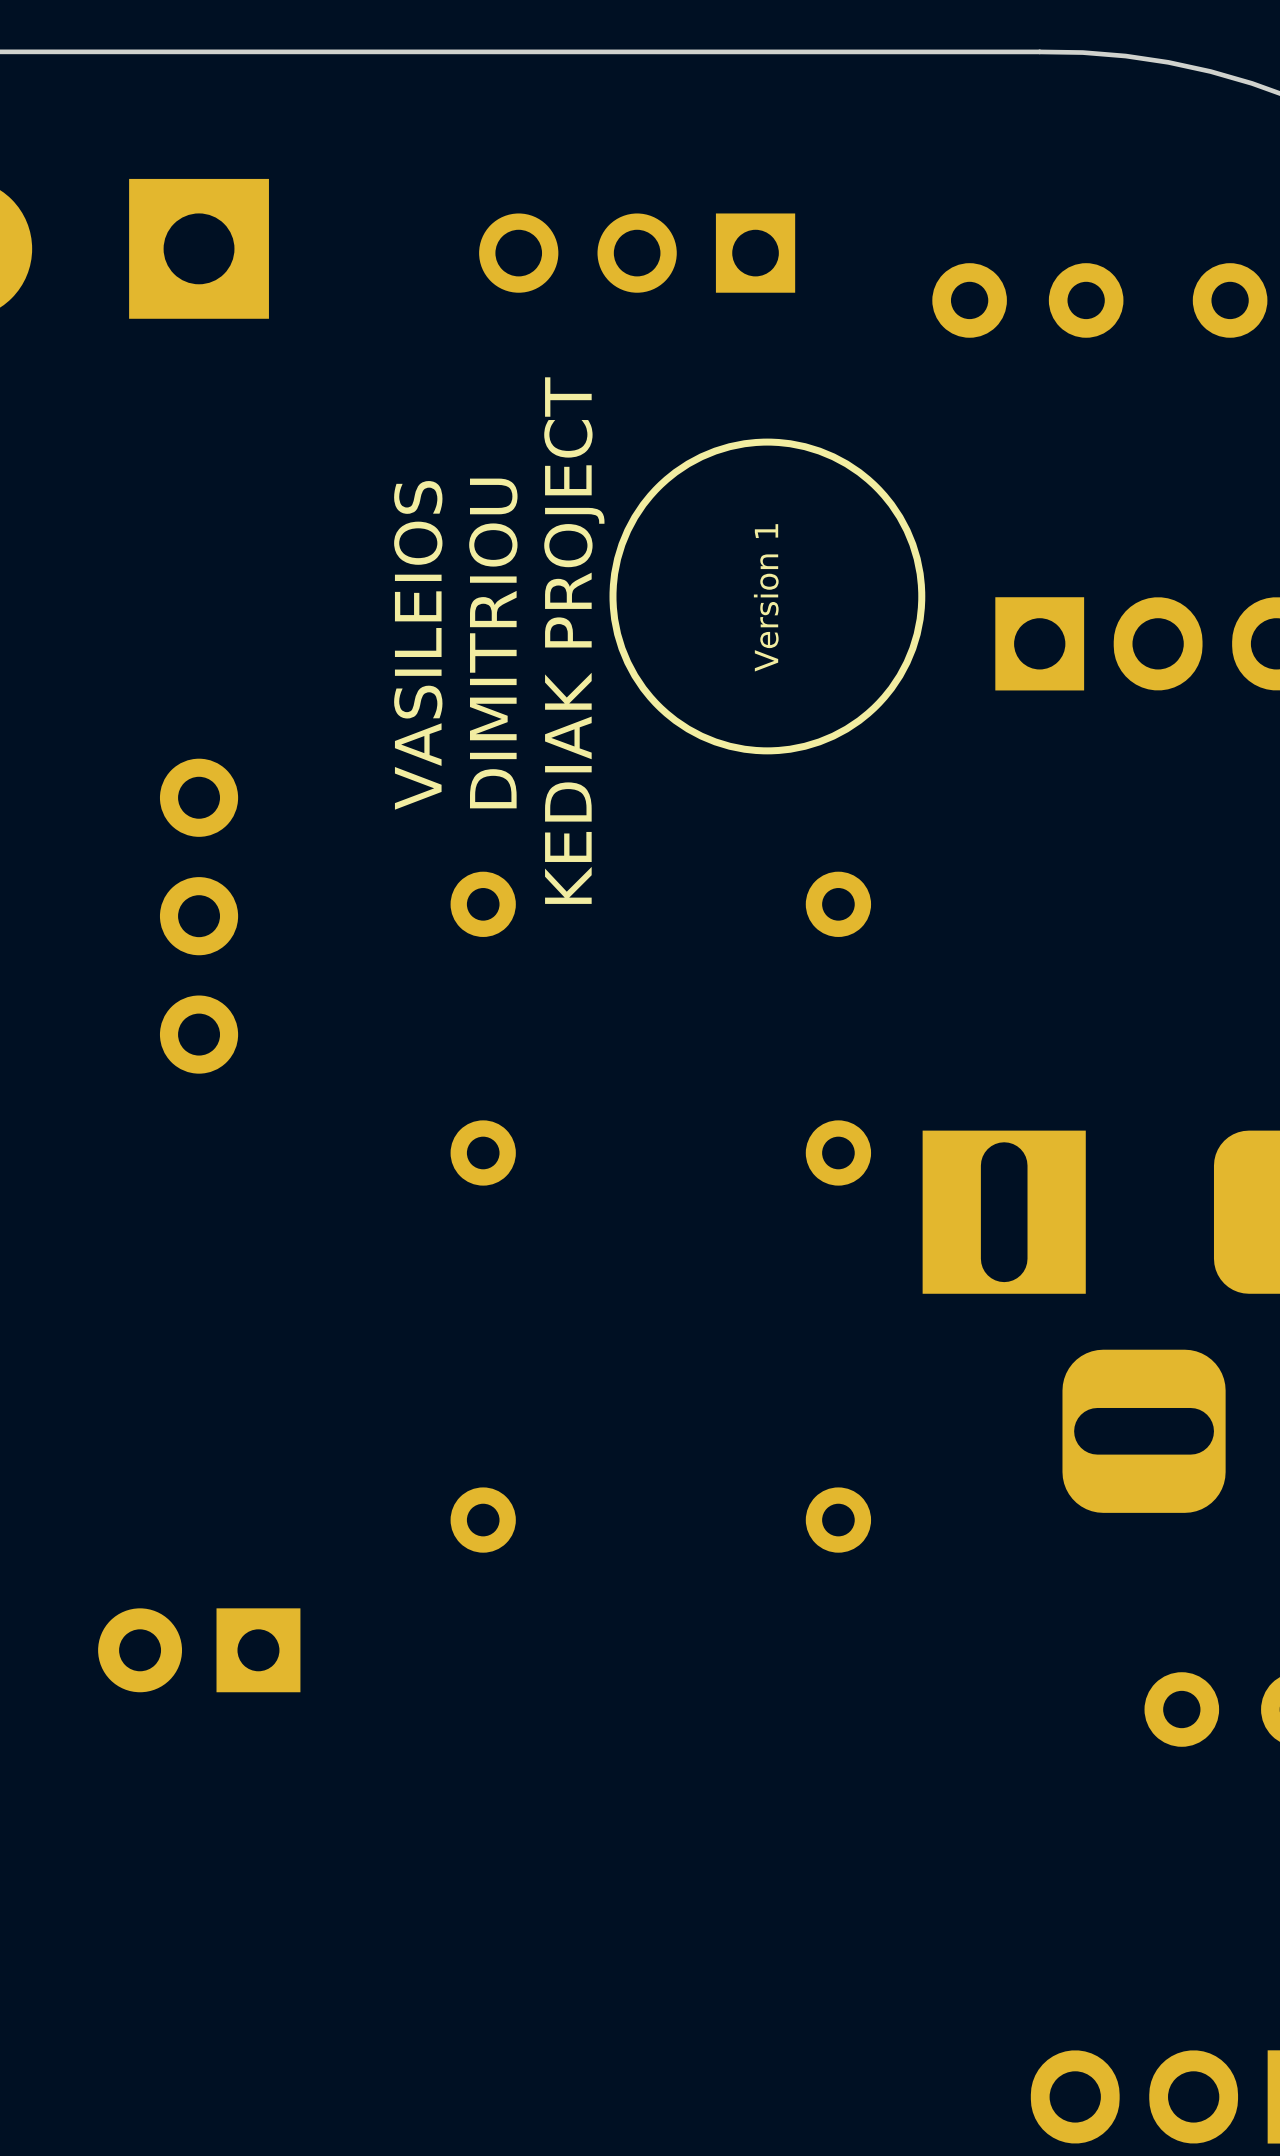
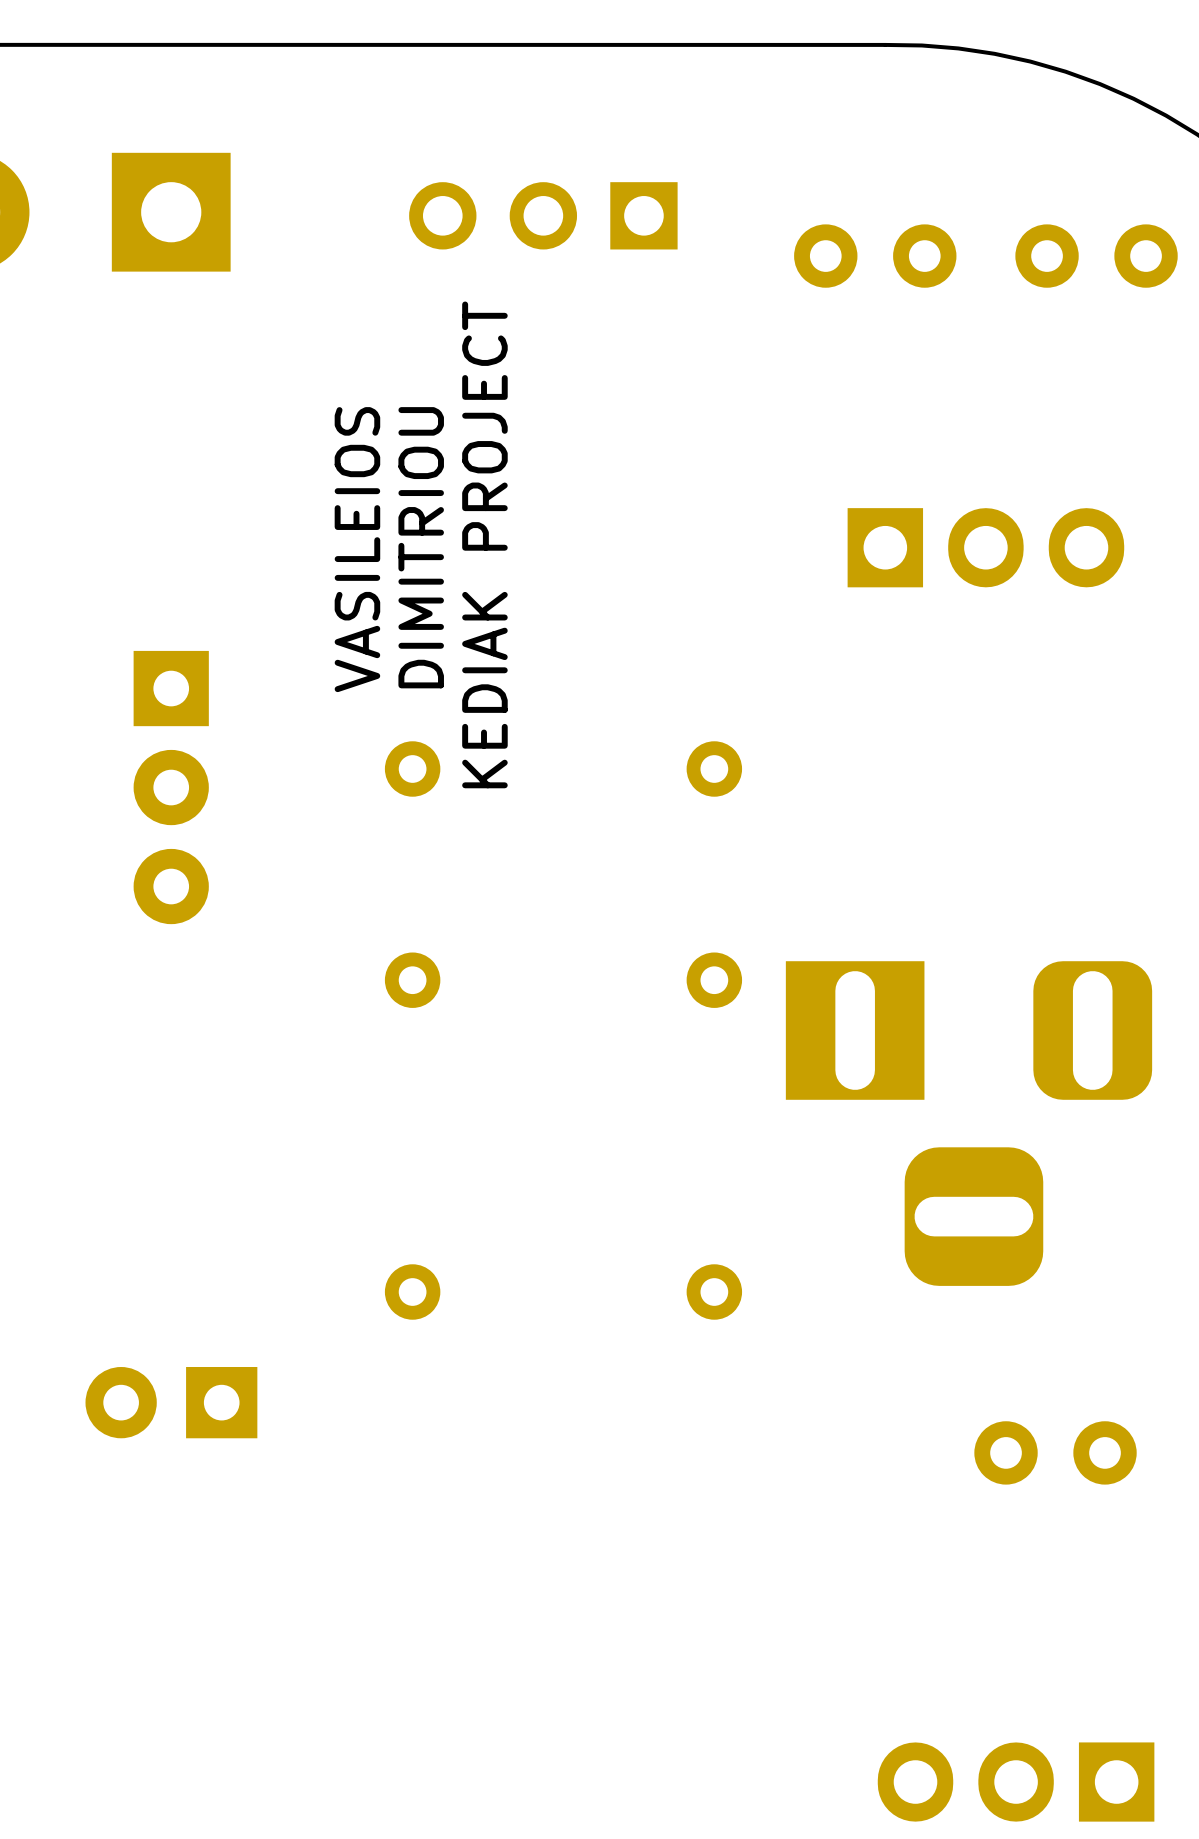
drawing: [609, 438, 926, 755] -> none
text: Version 1 (766, 597) -> none
part footprint: [159, 758, 239, 1074] -> [133, 650, 209, 925]

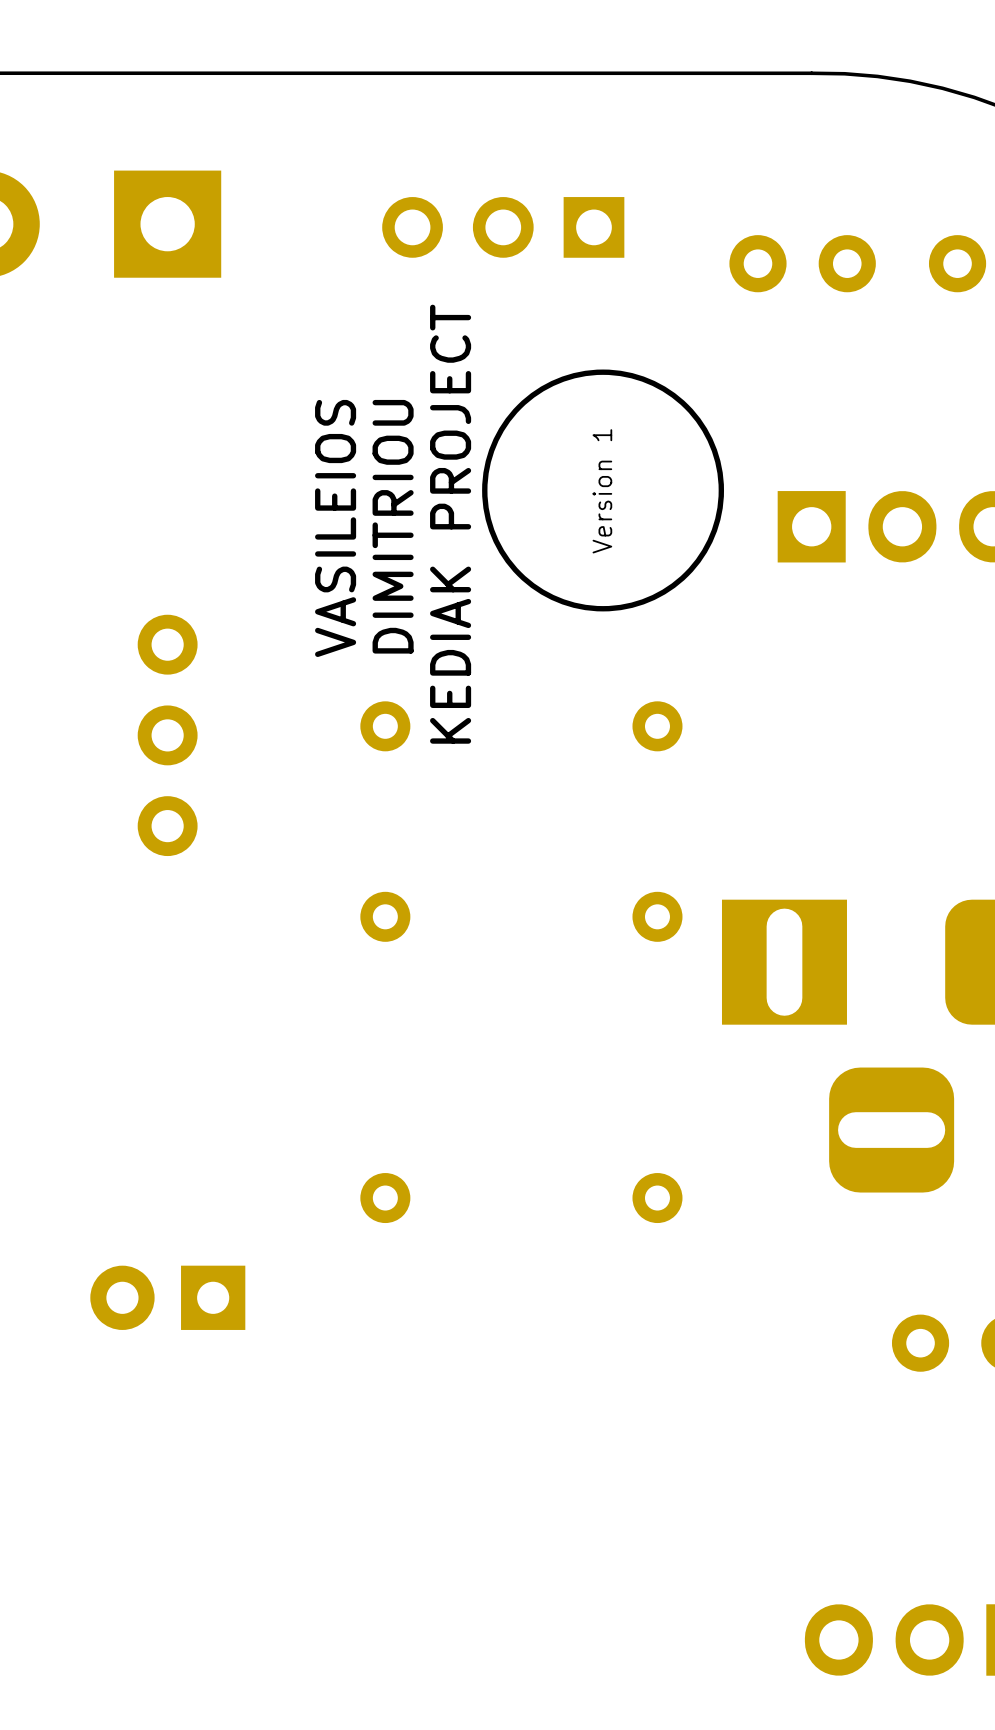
drawing: none -> [482, 369, 725, 612]
text: none -> Version 1 (602, 491)
part footprint: [133, 650, 209, 925] -> [137, 614, 198, 857]

